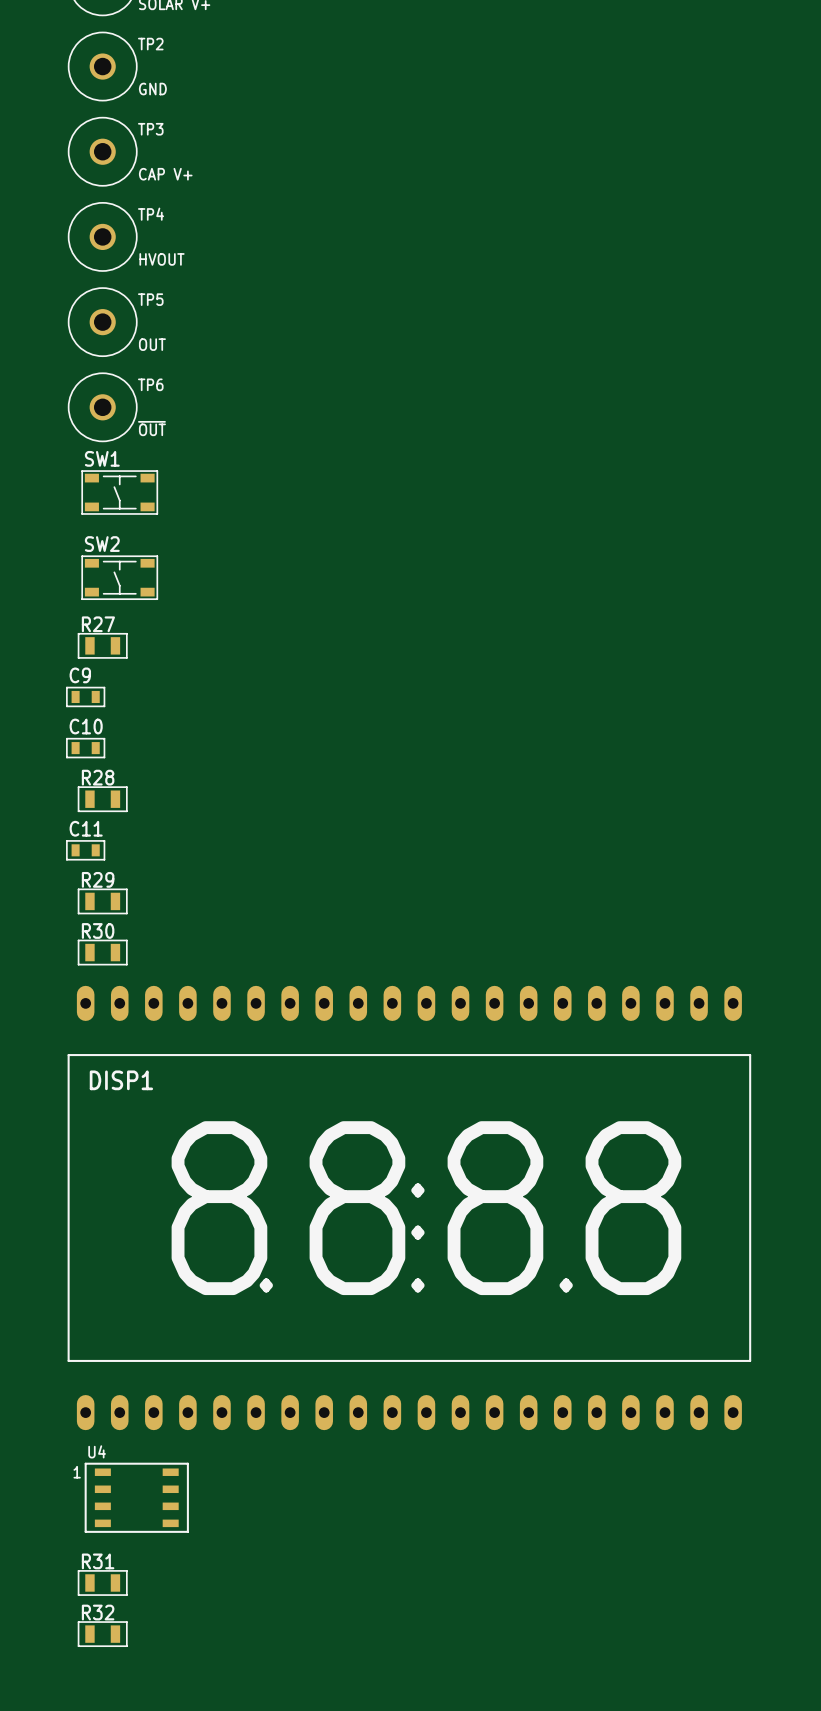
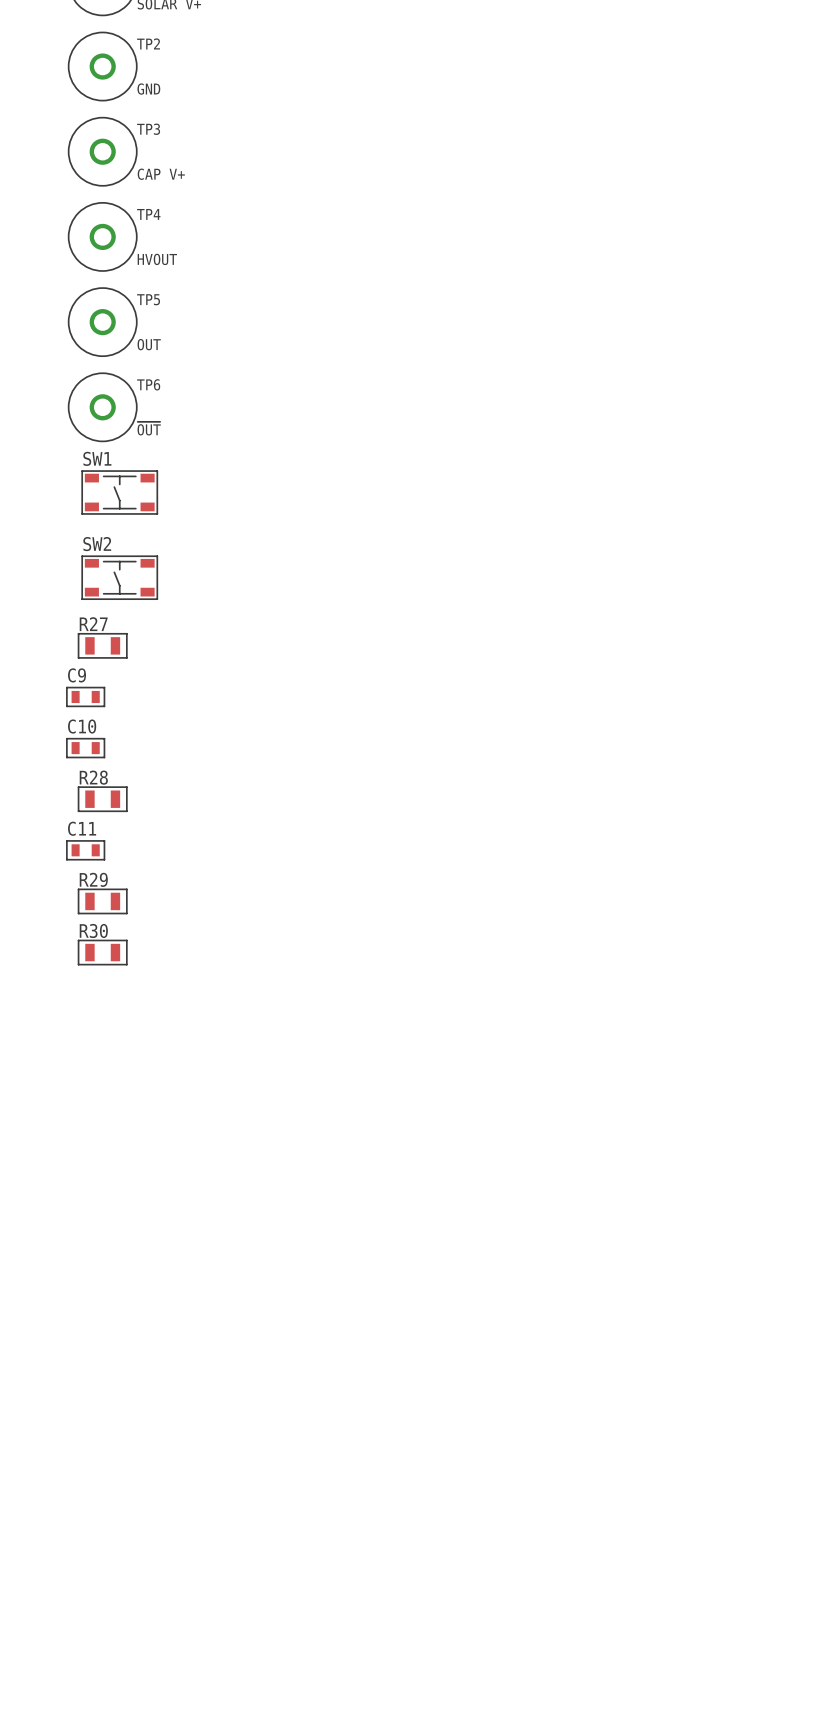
DISP1: (409, 1207) -> none
U4: (136, 1497) -> none
R31: (102, 1582) -> none
R32: (102, 1634) -> none

